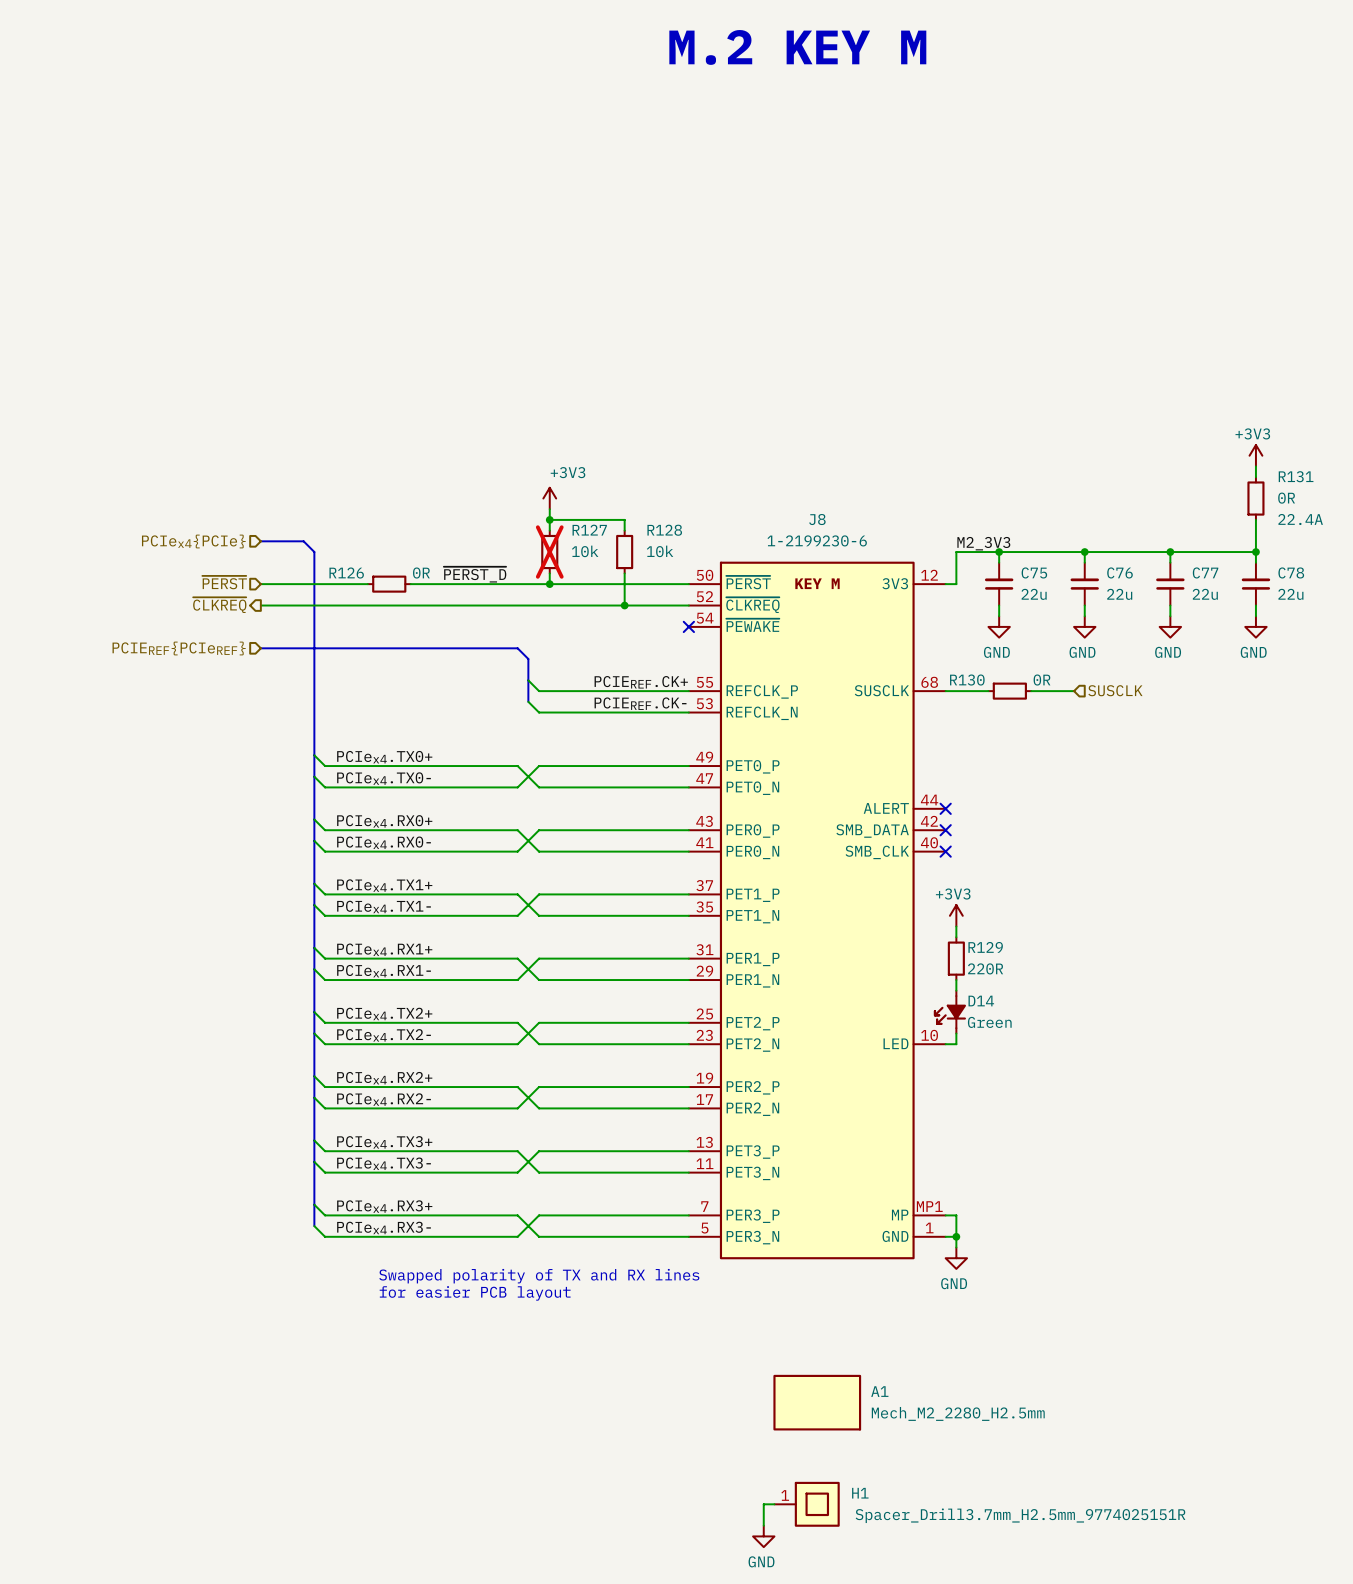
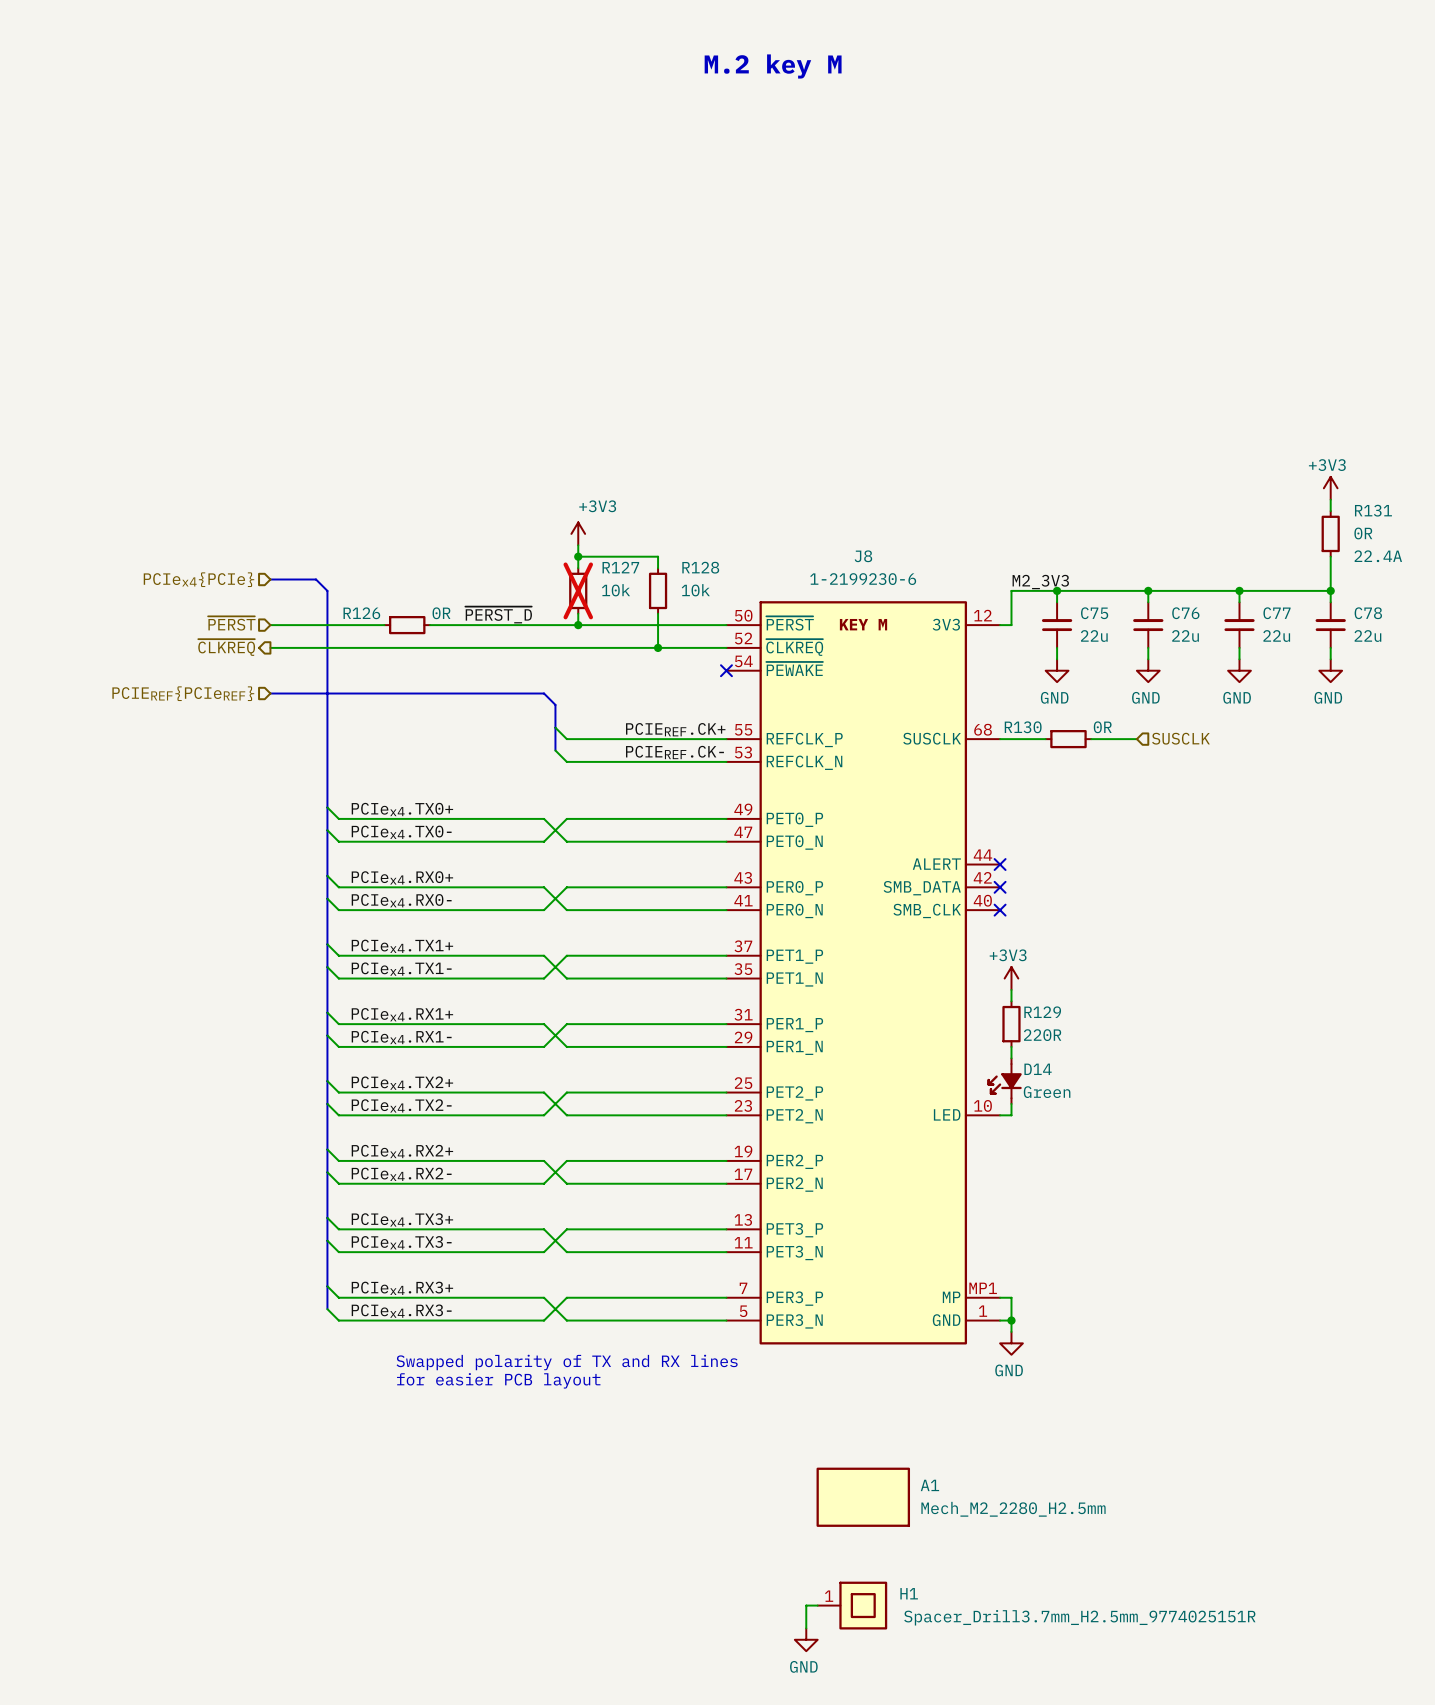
text: M.2 KEY M (797, 47) -> M.2 key M (773, 66)

